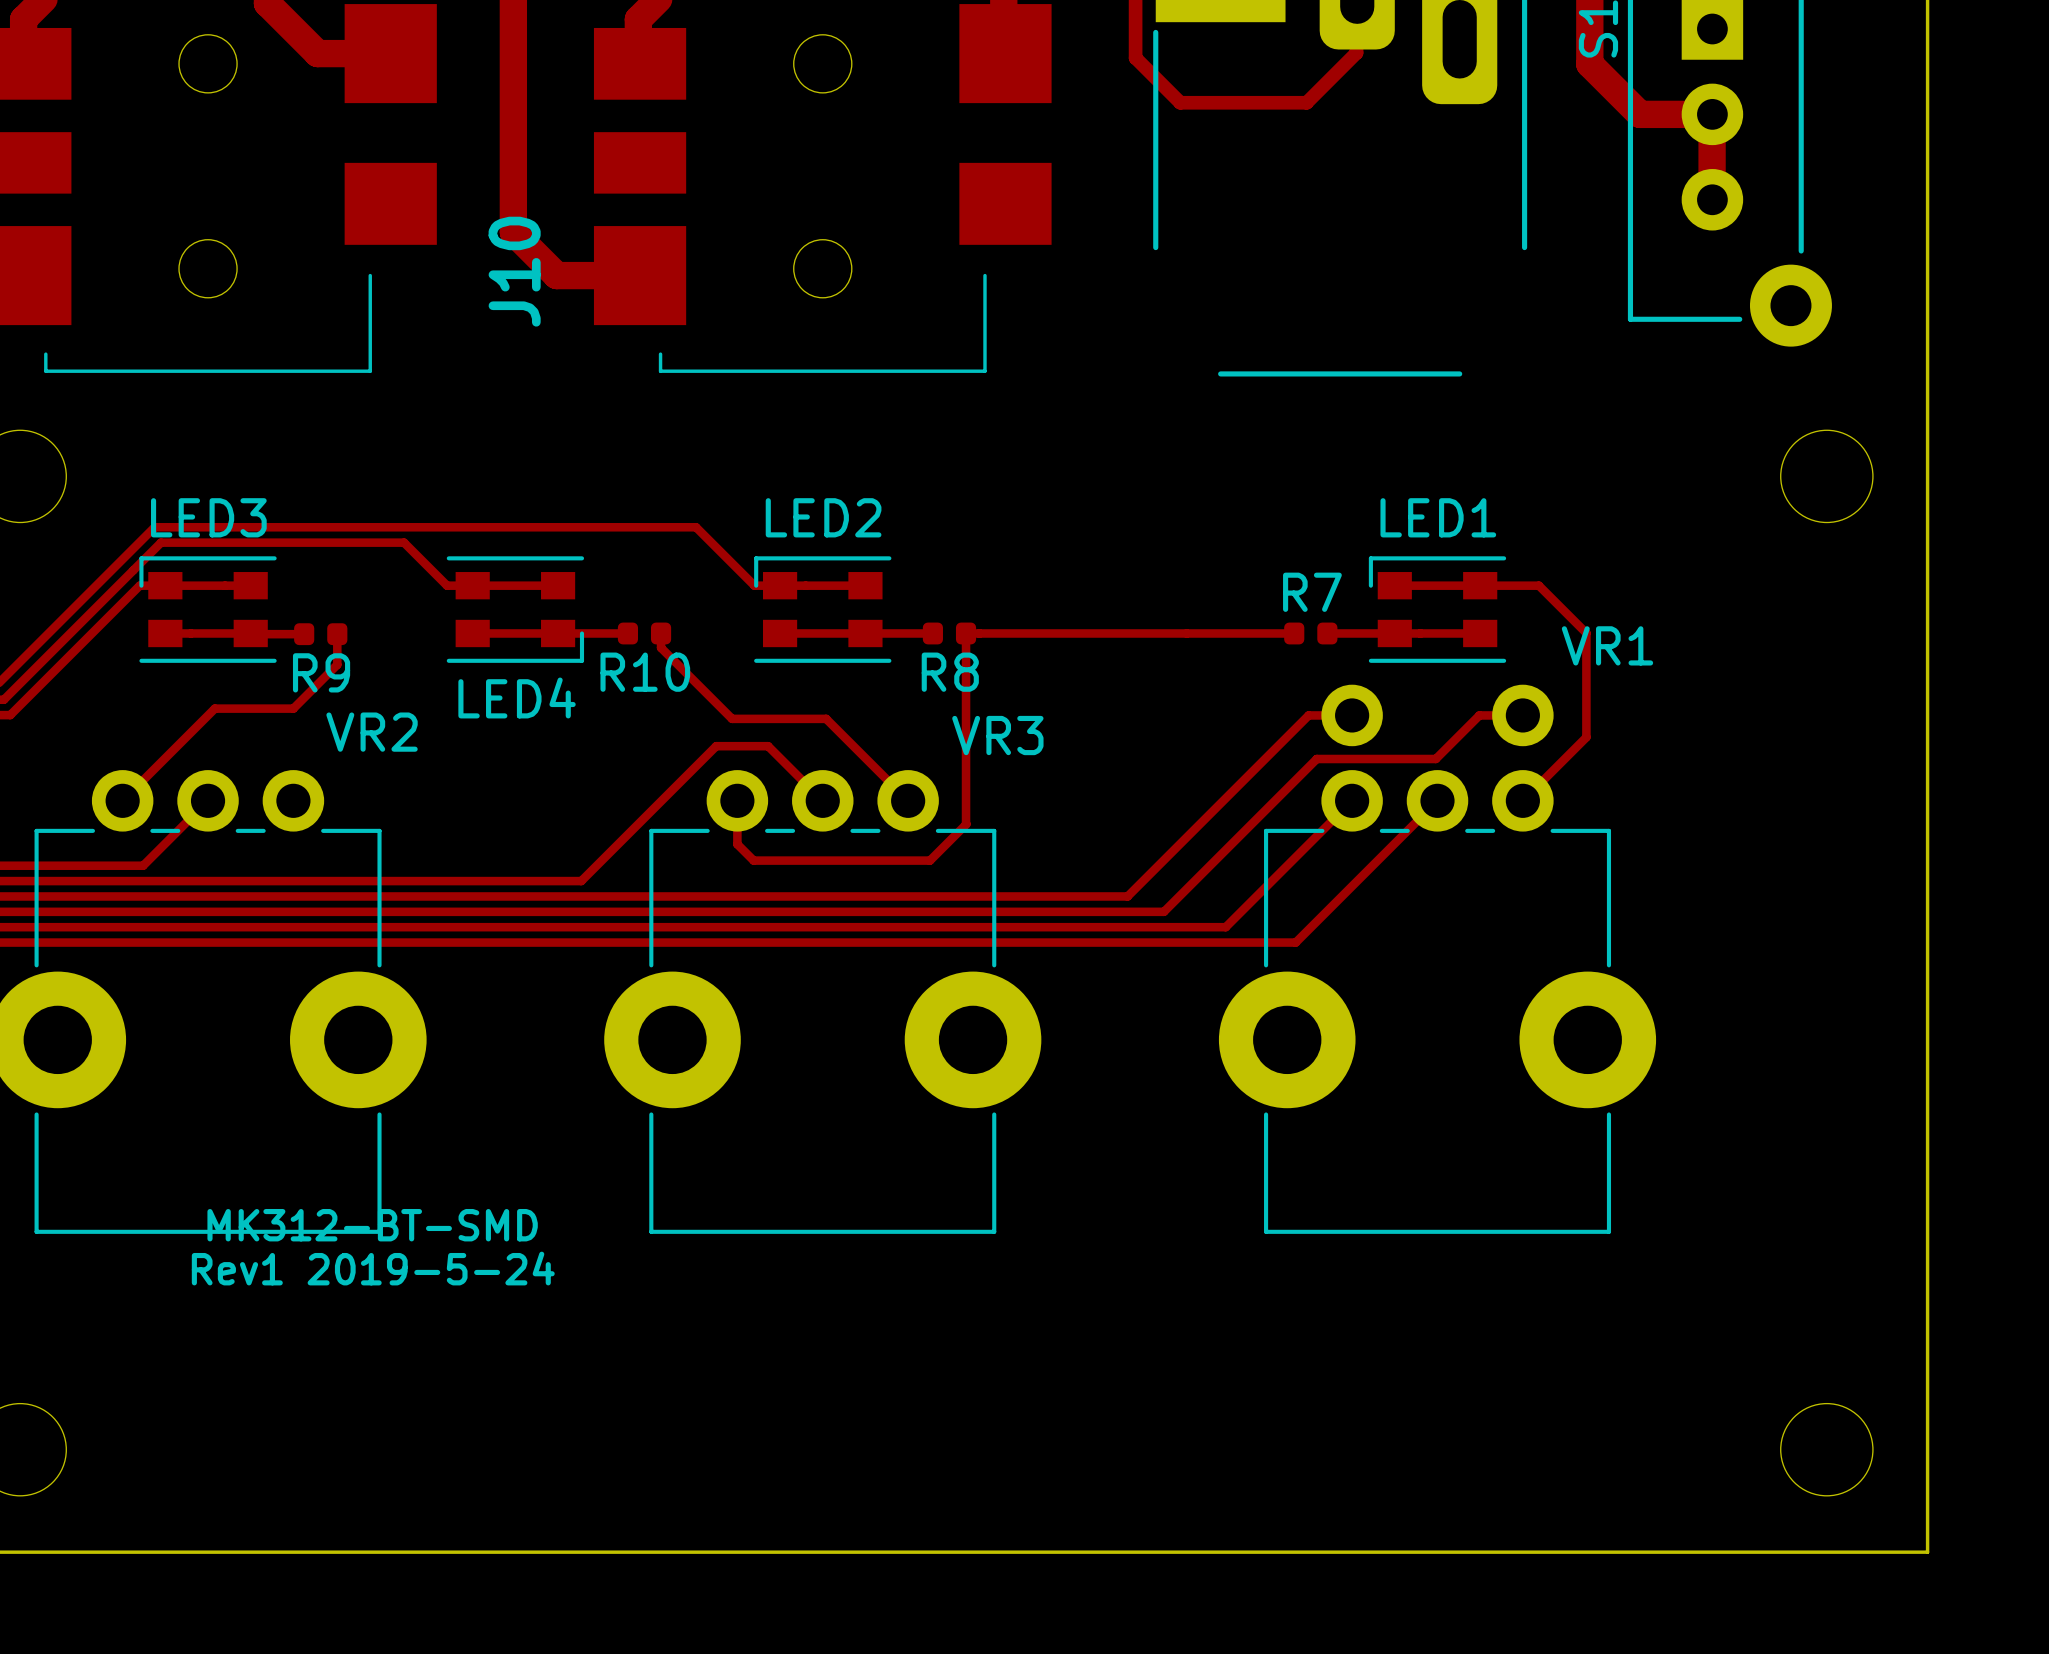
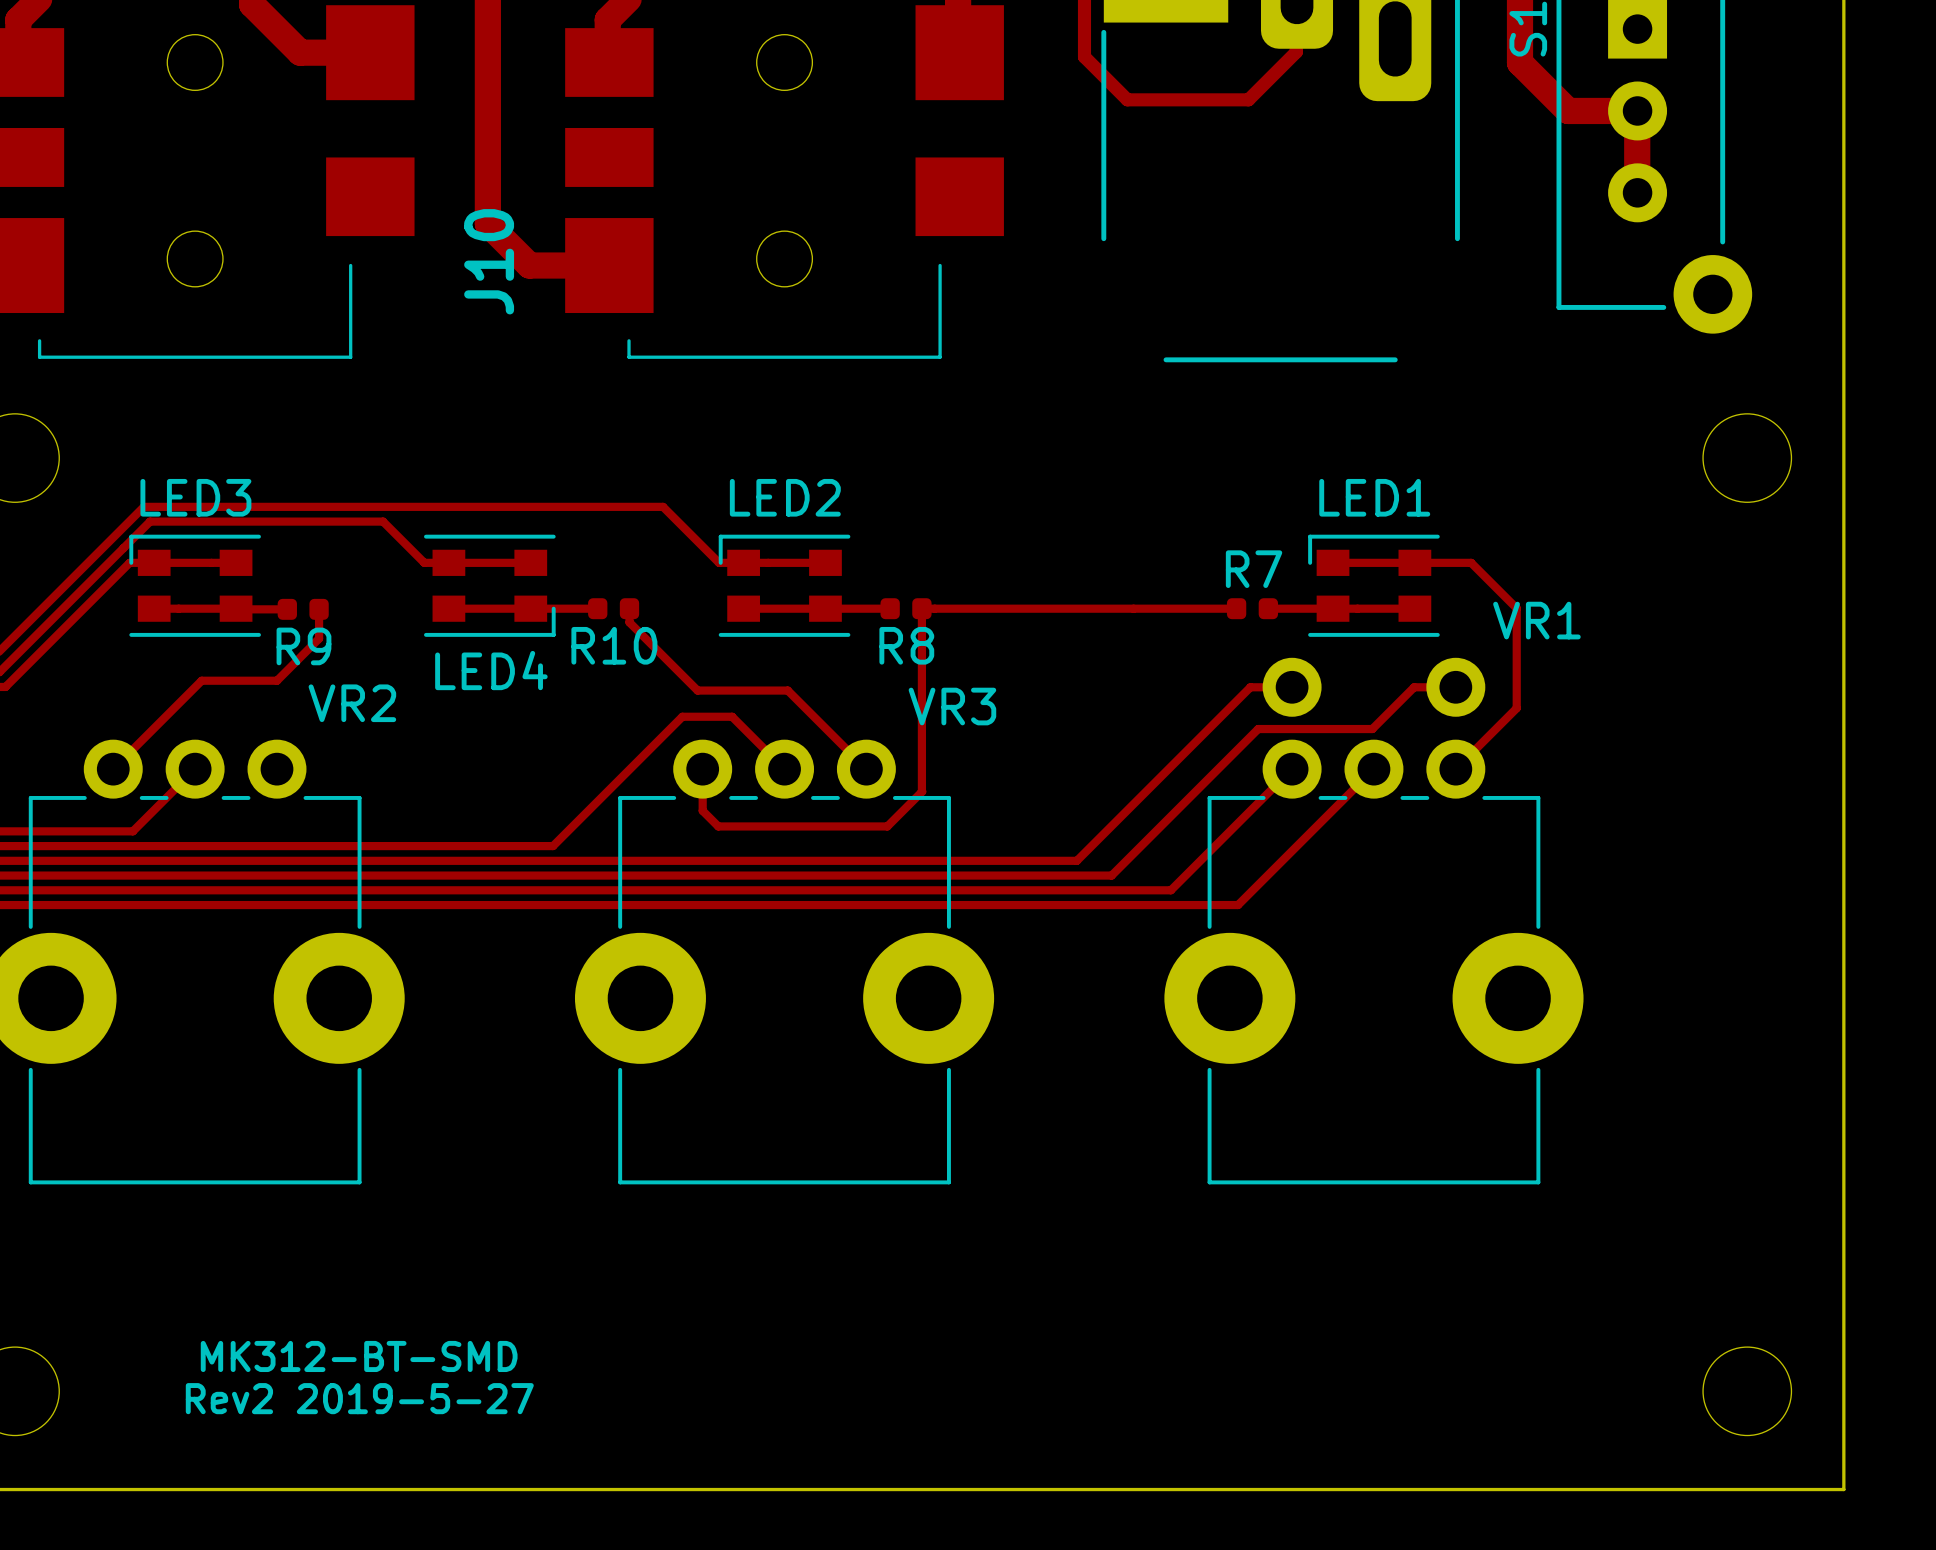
text position: MK312-BT-SMD (372, 1225) -> MK312-BT-SMD (359, 1356)
text: Rev1 2019-5-24 (373, 1268) -> none
text: none -> Rev2 2019-5-27 (359, 1398)

